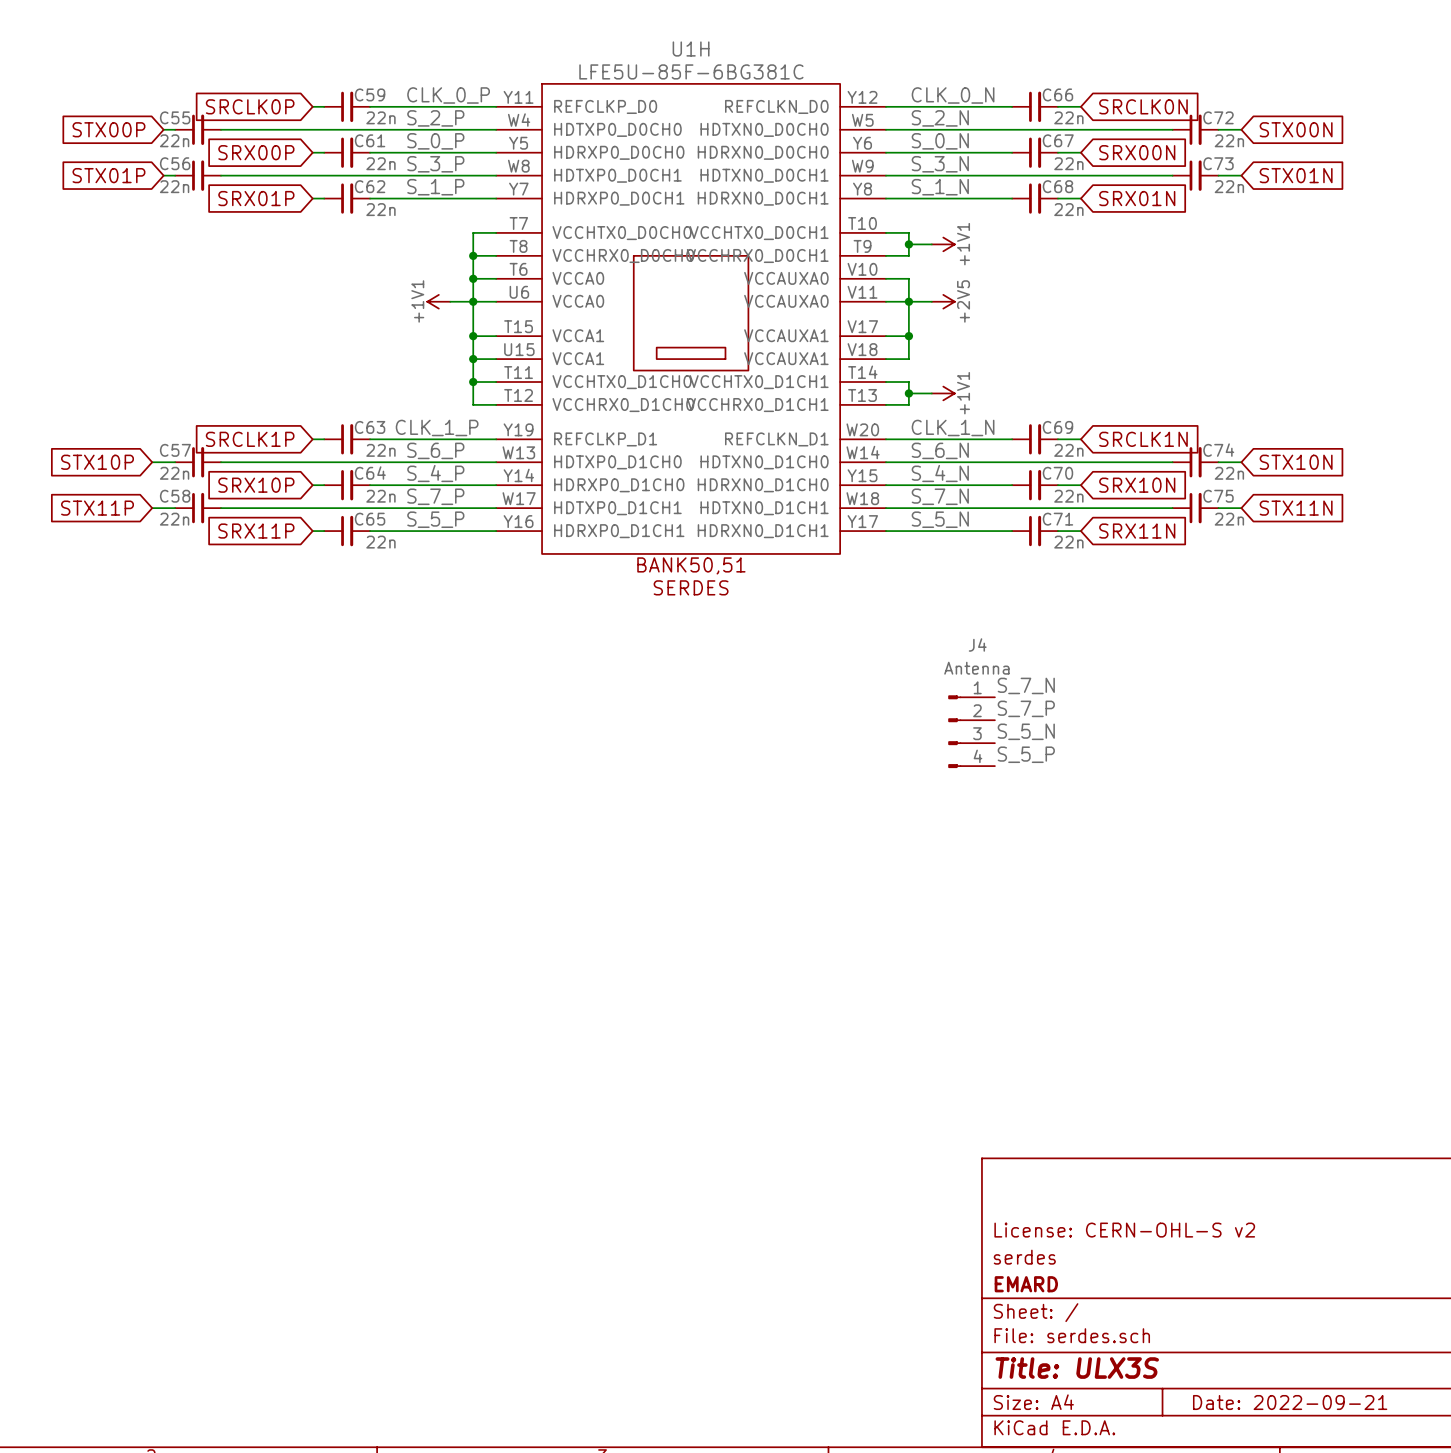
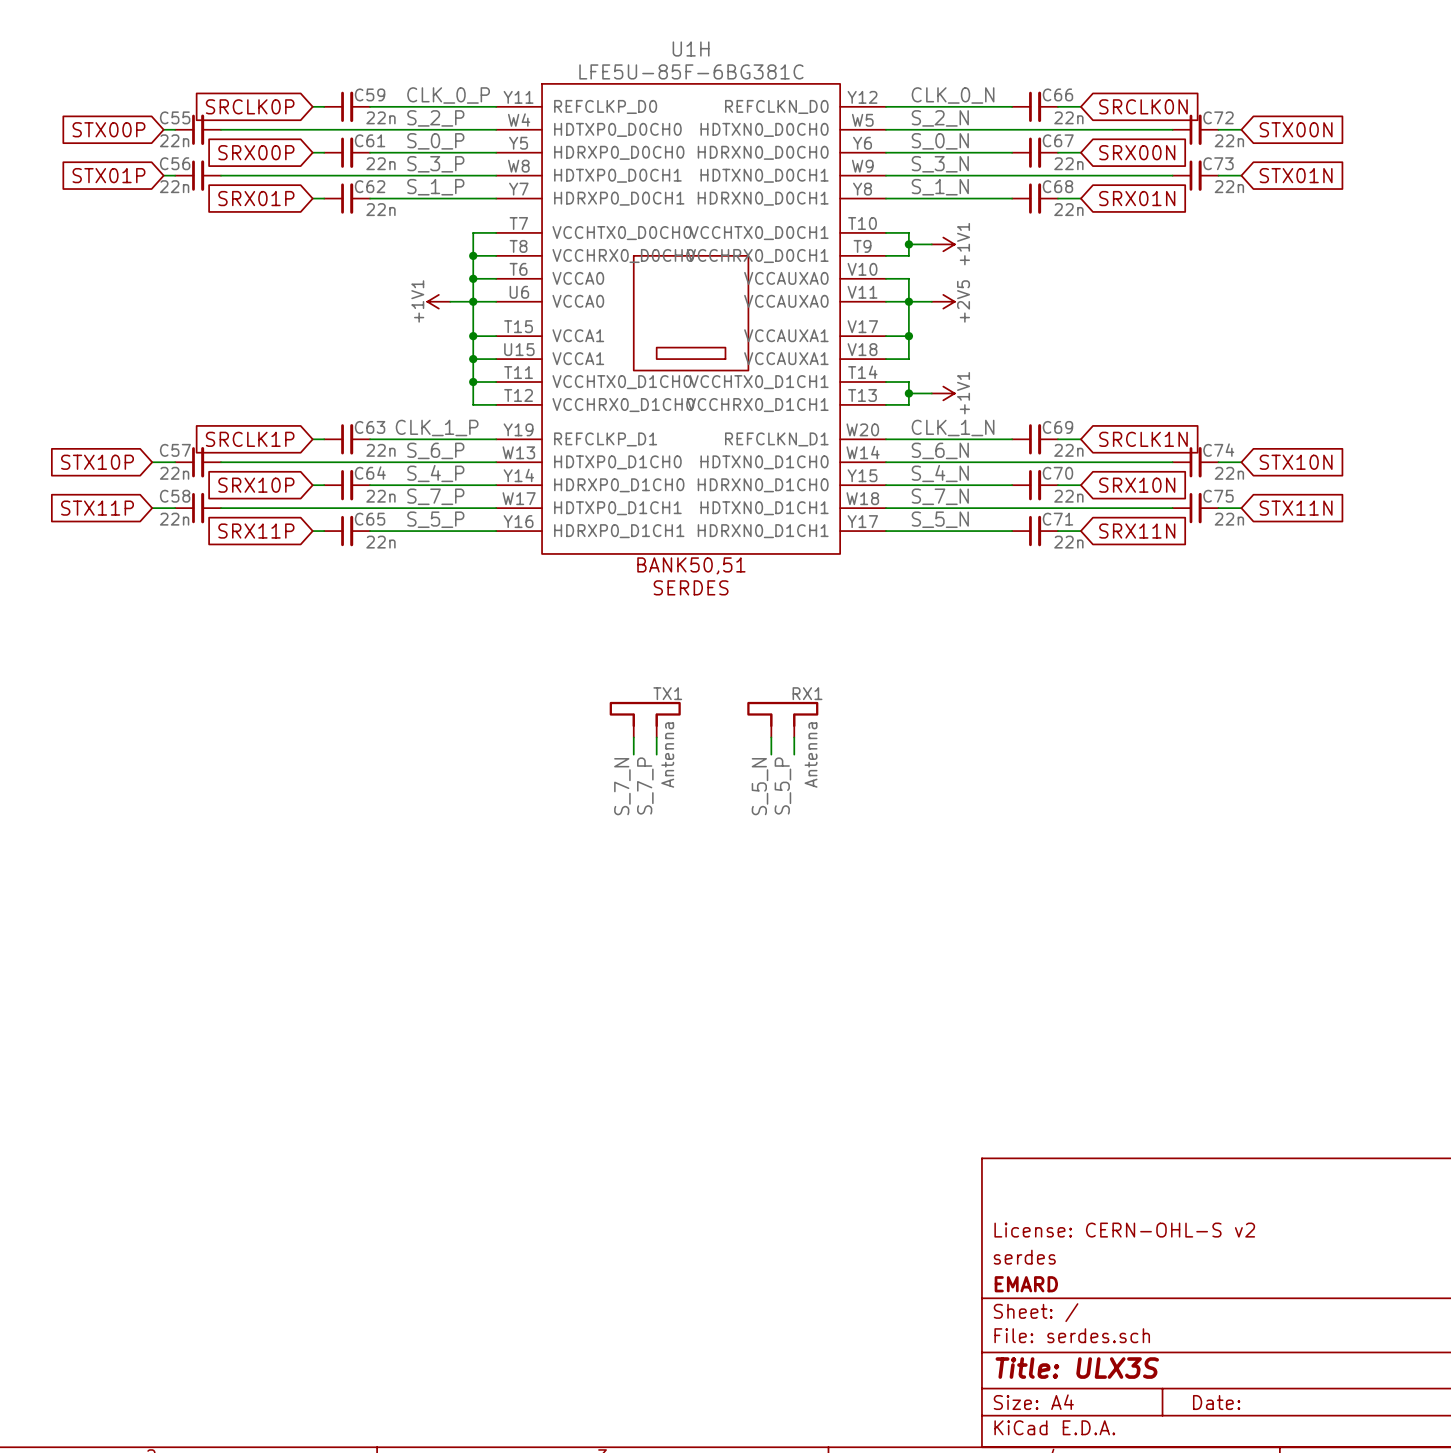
label: S_7_N (1026, 685) -> none
label: S_7_P (1026, 708) -> none
TX1: none -> Antenna (645, 719)
RX1: none -> Antenna (782, 719)
J4: Antenna (971, 731) -> none
label: S_5_N (1026, 731) -> none
wire: none -> (633, 737) (633, 754)
wire: none -> (656, 737) (656, 754)
wire: none -> (771, 737) (771, 754)
wire: none -> (794, 737) (794, 754)
label rotation: 0° (1026, 754) -> 90° counterclockwise (782, 785)
label position: S_5_P (1026, 754) -> S_5_P (782, 785)
label: none -> S_7_P (645, 785)
label: none -> S_7_N (622, 786)
label: none -> S_5_N (759, 786)
title block: Date: 2022-09-21 (1290, 1402) -> Date: (1216, 1402)

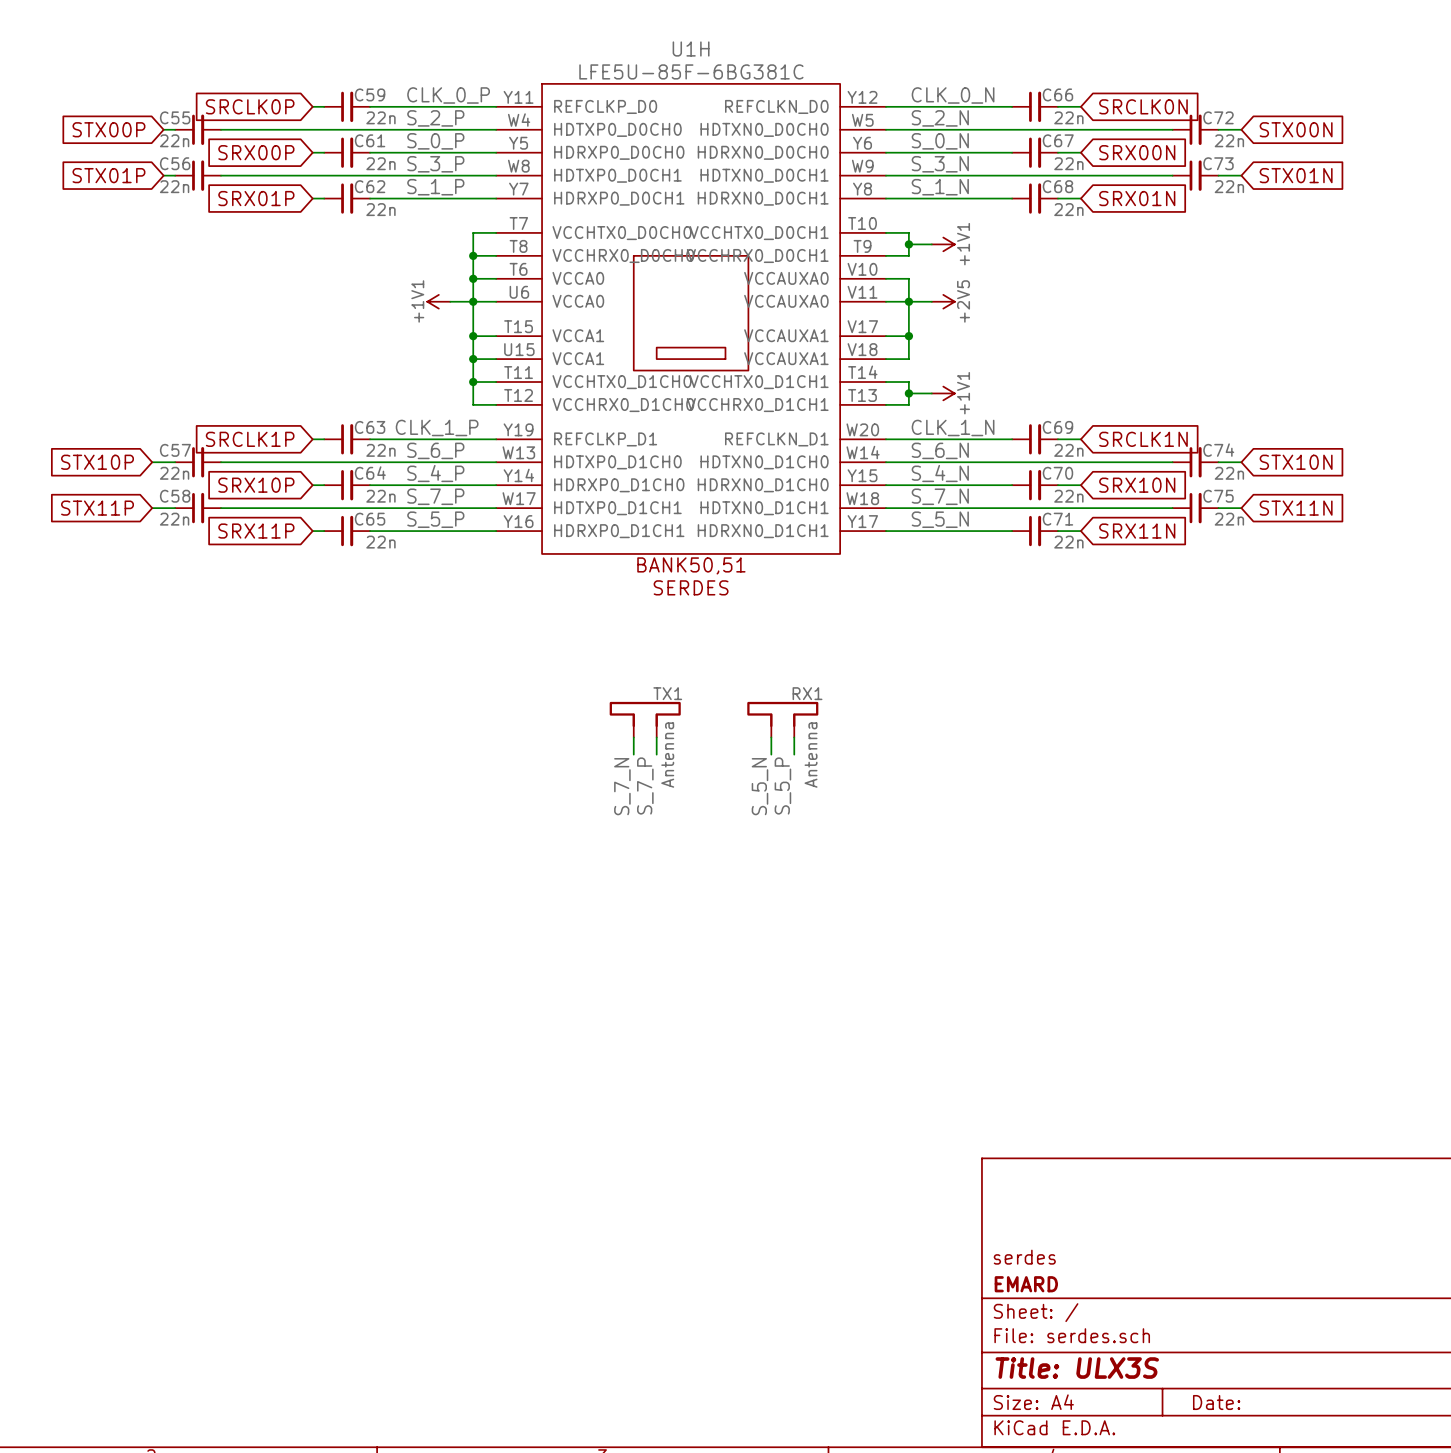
title block: License: CERN-OHL-S v2 (1124, 1230) -> none

